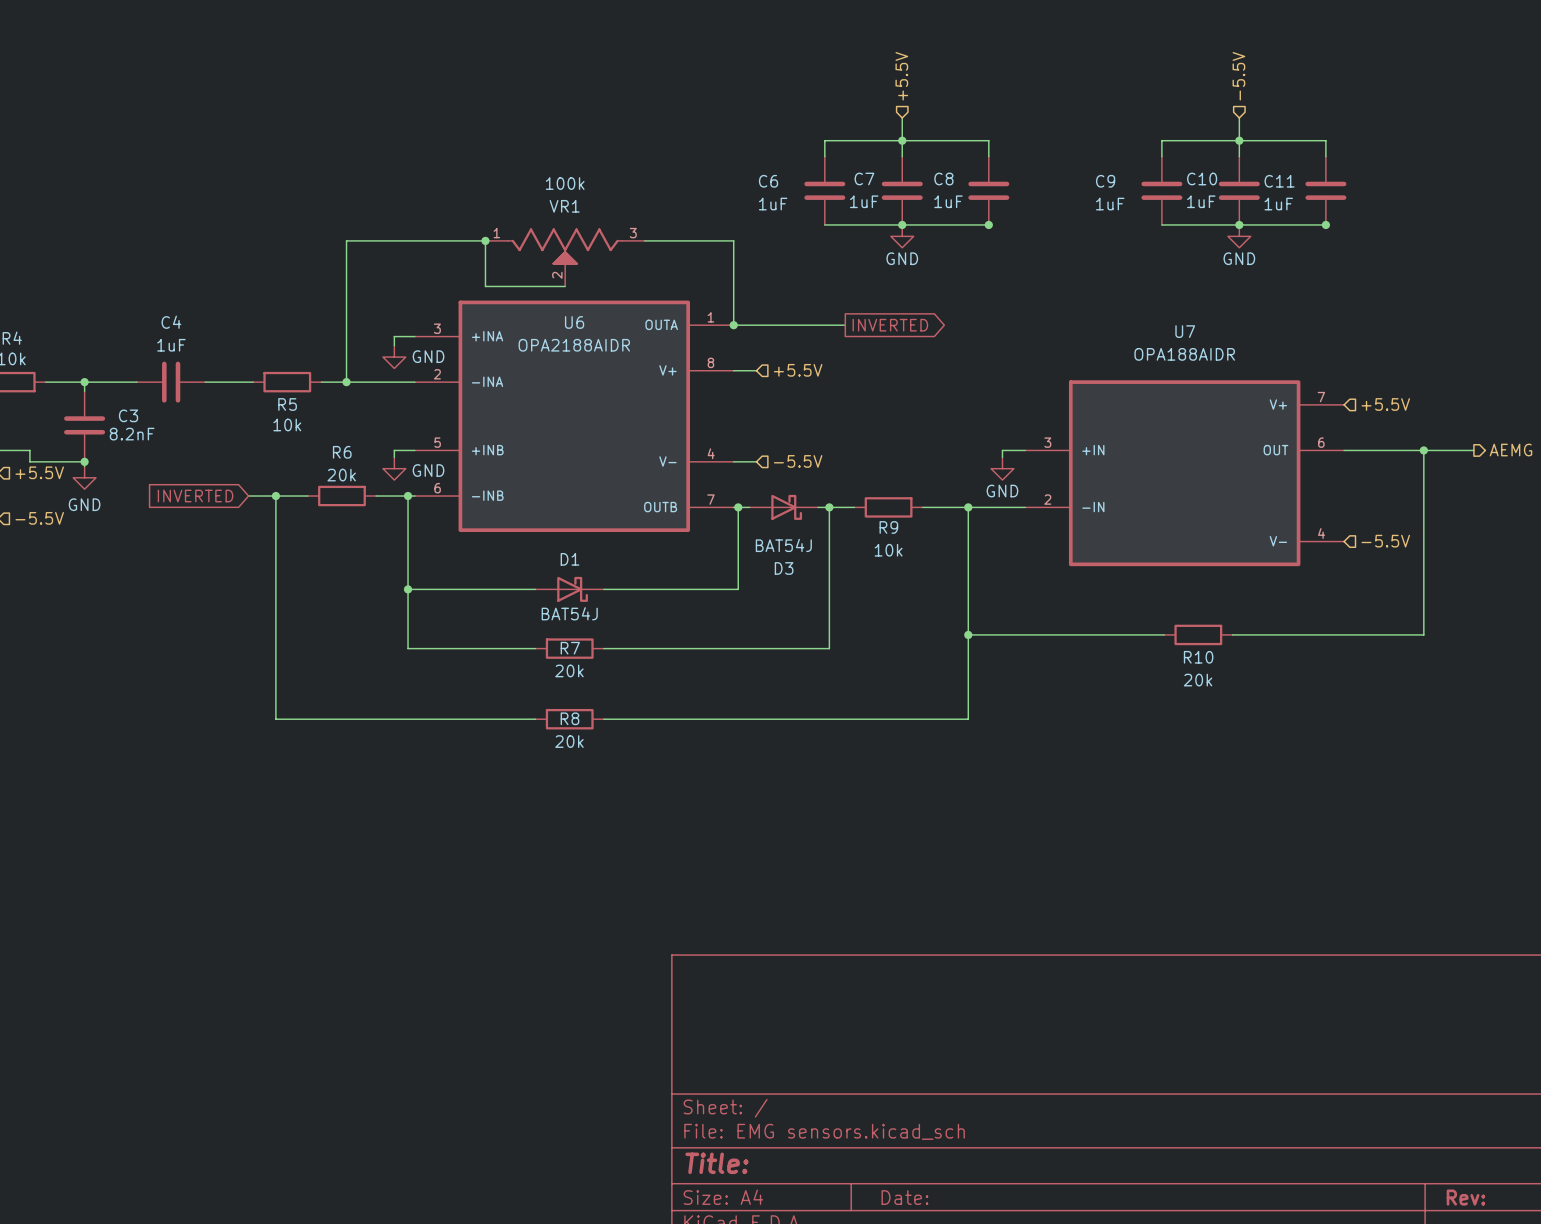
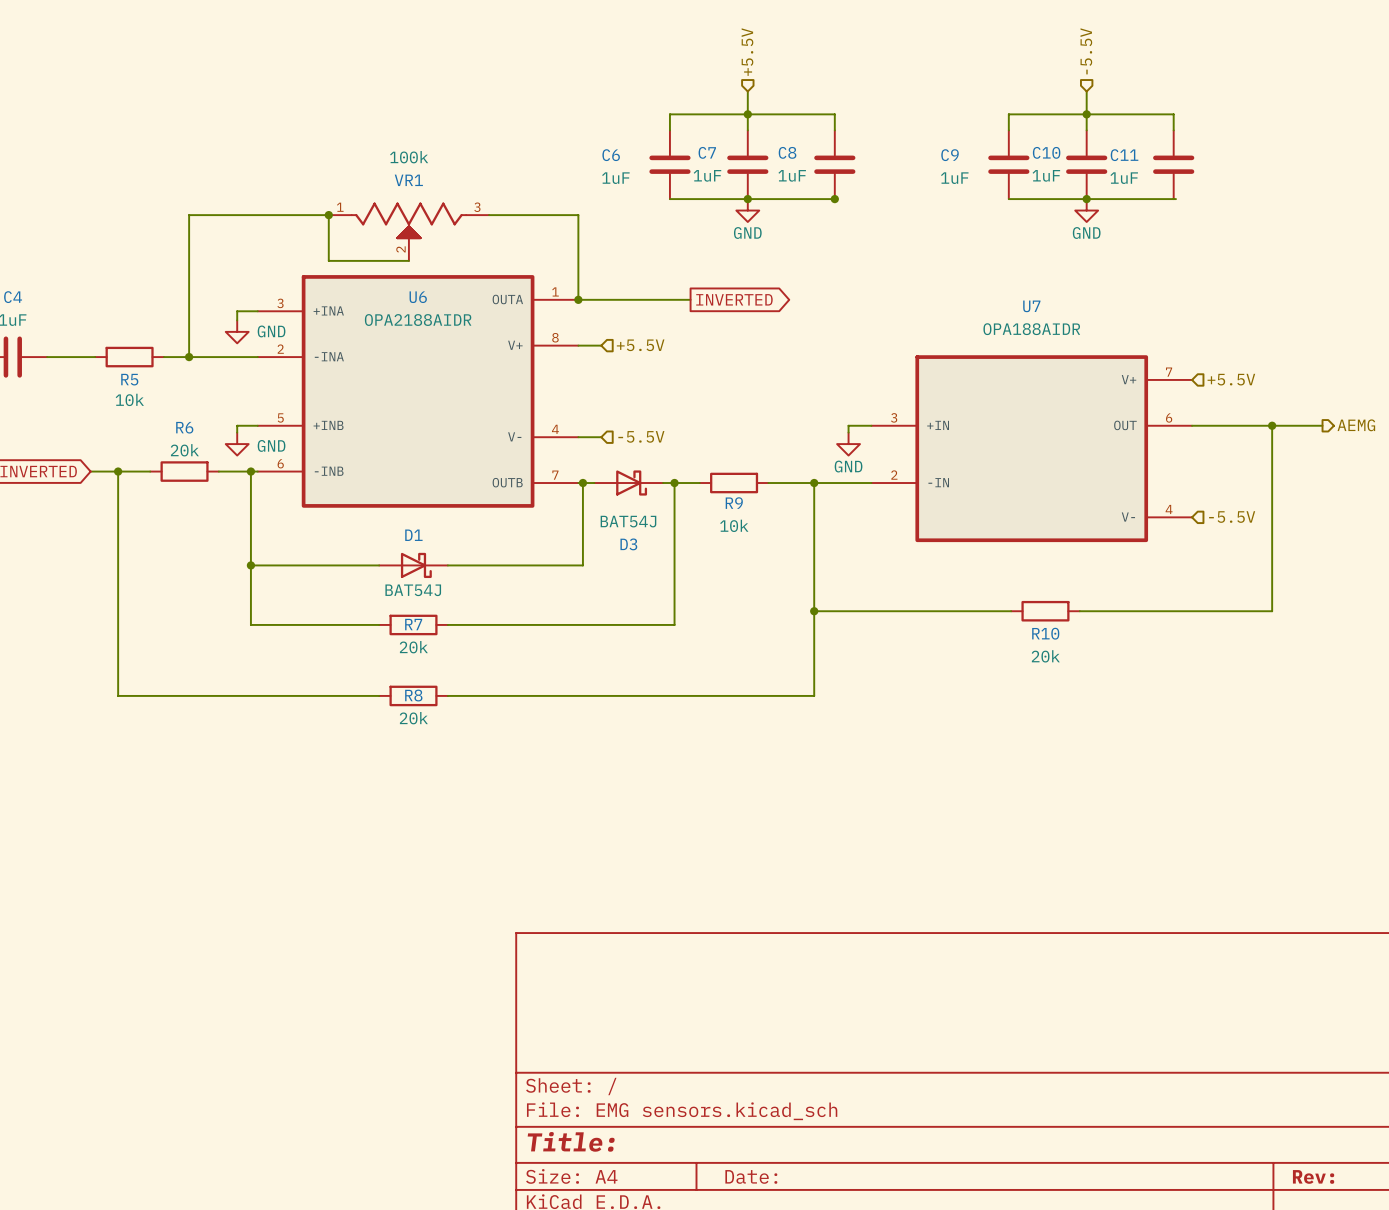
junction: (1325, 224) -> none

